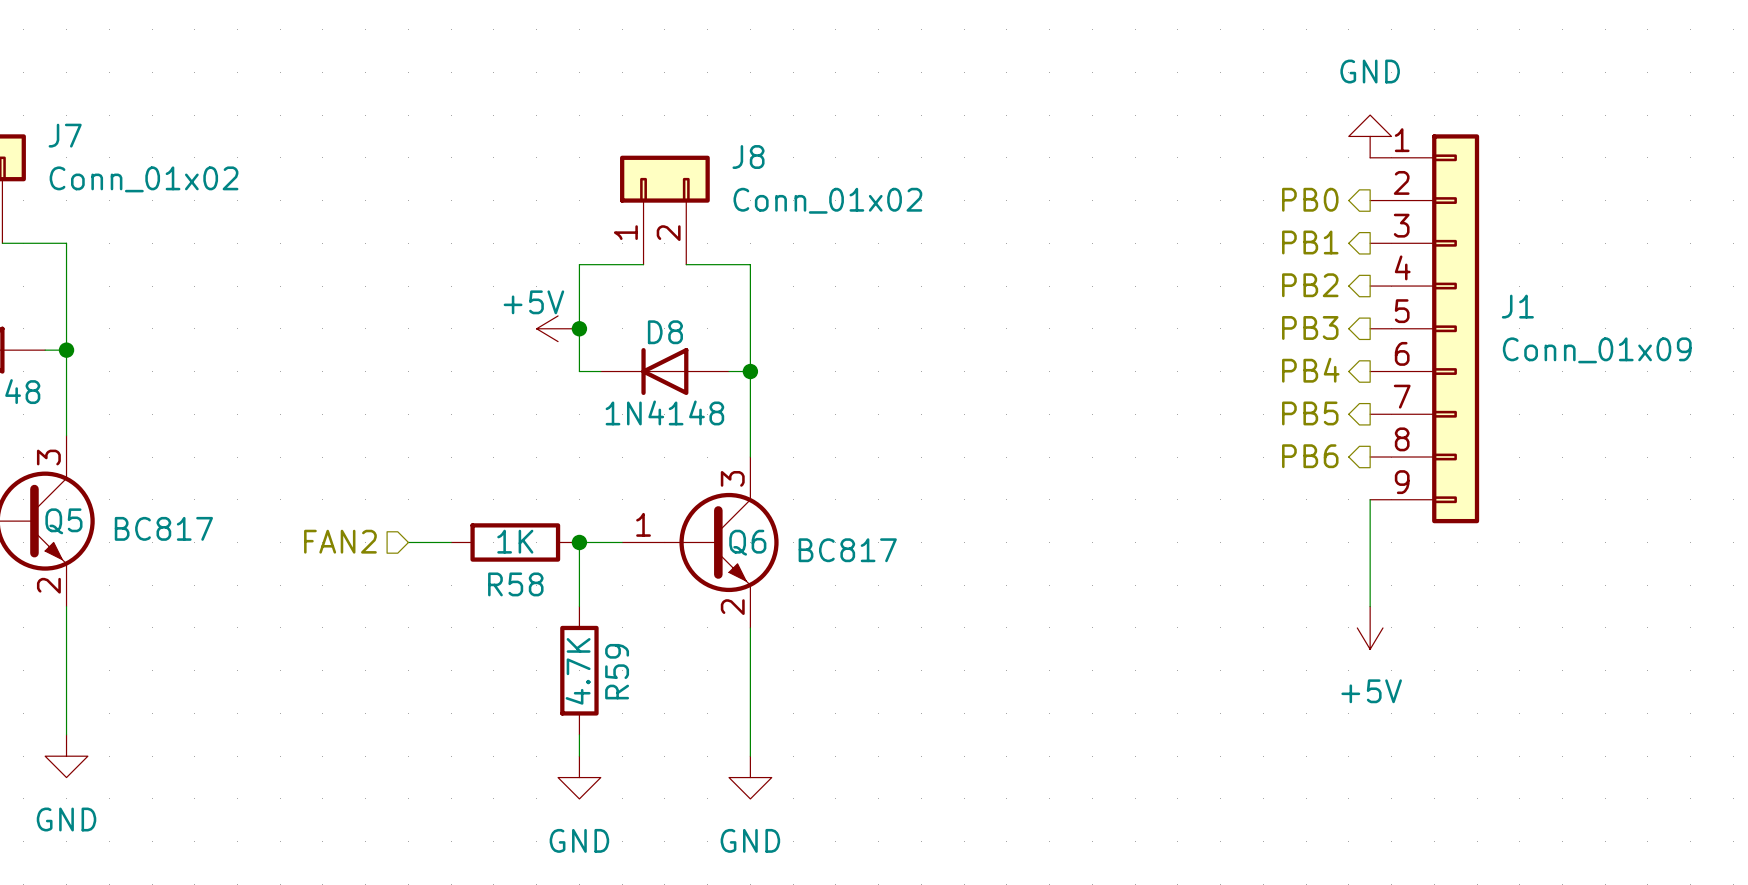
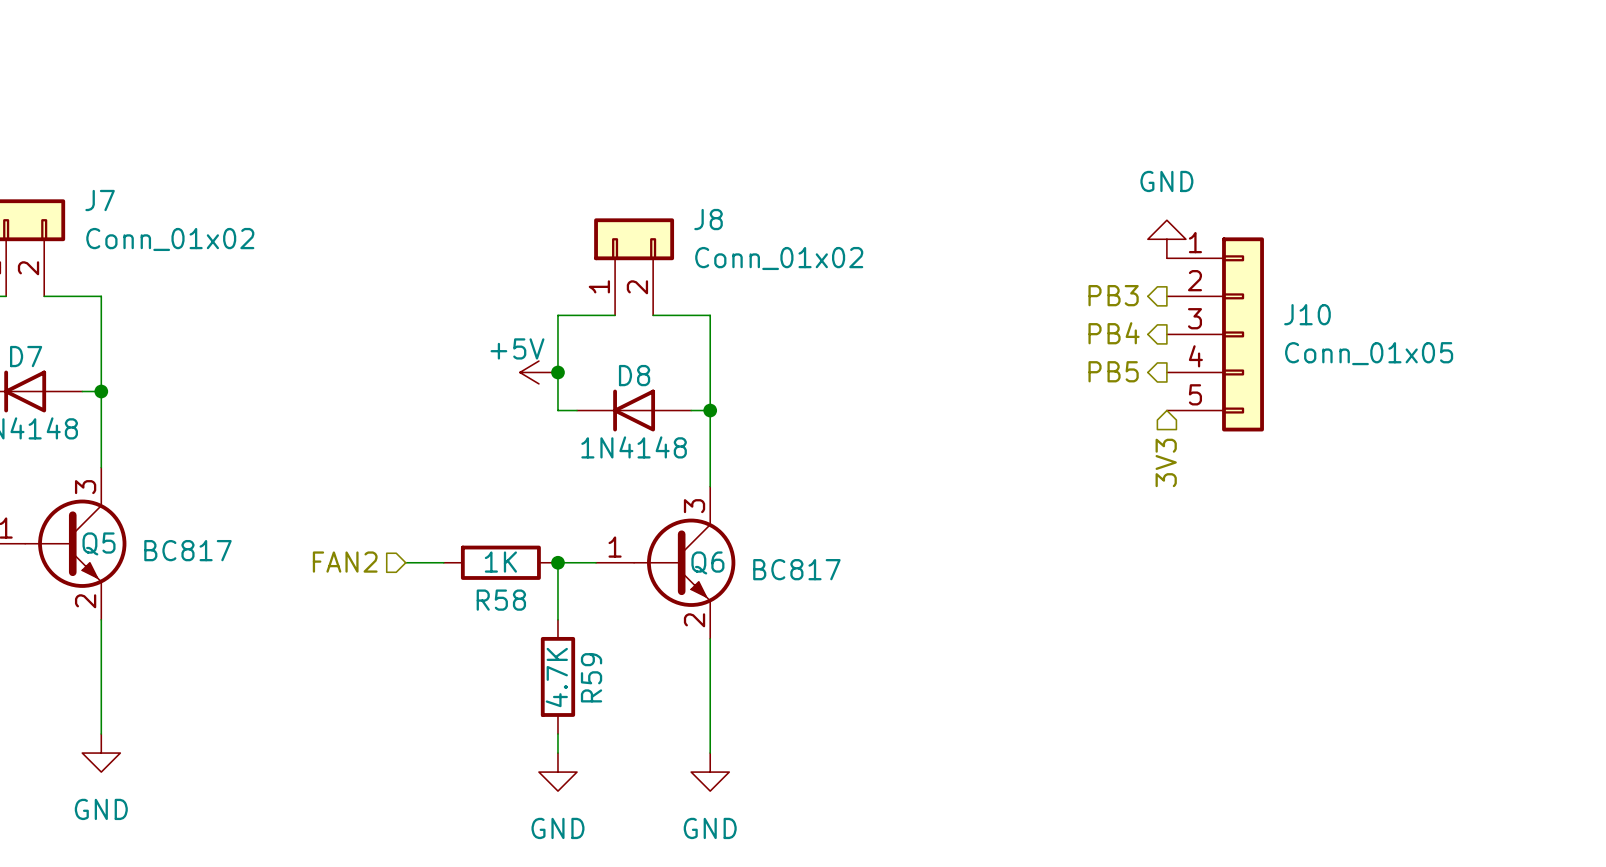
power symbol position: GND (1370, 136) -> GND (1166, 239)
hierarchical label: PB0 (1310, 199) -> none
hierarchical label: PB1 (1310, 242) -> none
hierarchical label: PB2 (1310, 285) -> none
J10: none -> Conn_01x05 (1215, 334)
hierarchical label position: PB3 (1310, 327) -> PB3 (1113, 295)
J1: Conn_01x09 (1424, 328) -> none
hierarchical label position: PB4 (1310, 370) -> PB4 (1114, 333)
hierarchical label position: PB5 (1310, 413) -> PB5 (1113, 371)
hierarchical label: none -> 3V3 (1166, 462)
hierarchical label: PB6 (1310, 456) -> none
wire: (1370, 499) (1370, 606) -> none
power symbol: +5V (1370, 627) -> none

